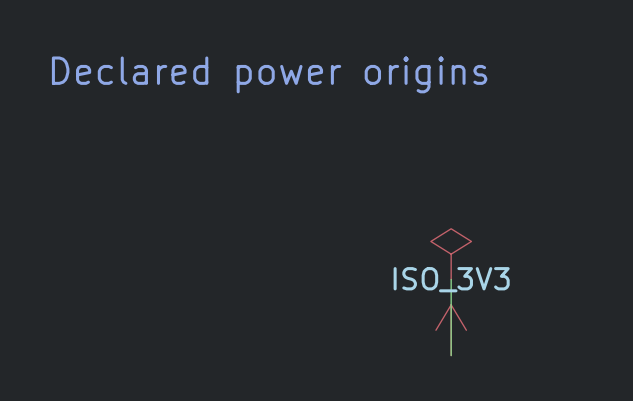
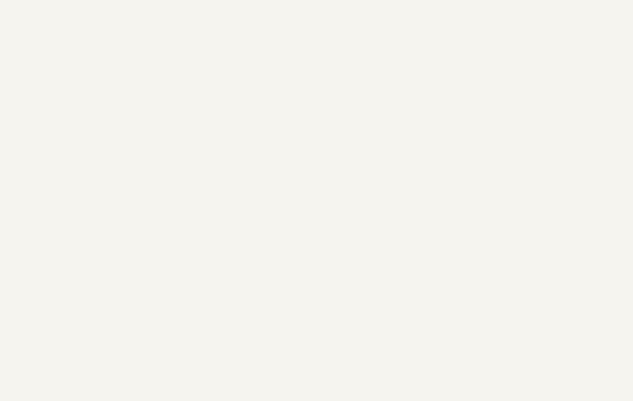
text: Declared power origins (269, 74) -> none
power symbol: (451, 254) -> none
wire: (451, 279) (451, 355) -> none
power symbol: ISO_3V3 (451, 330) -> none

